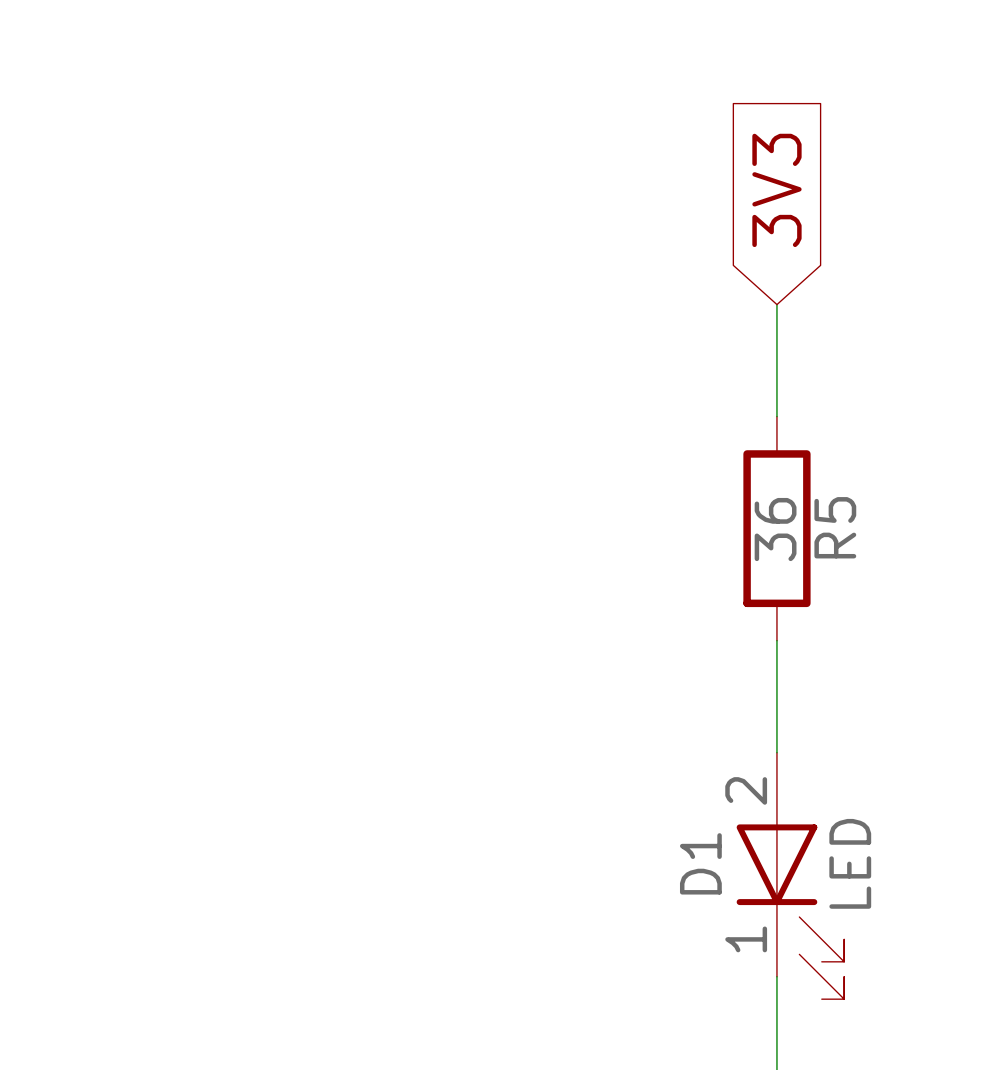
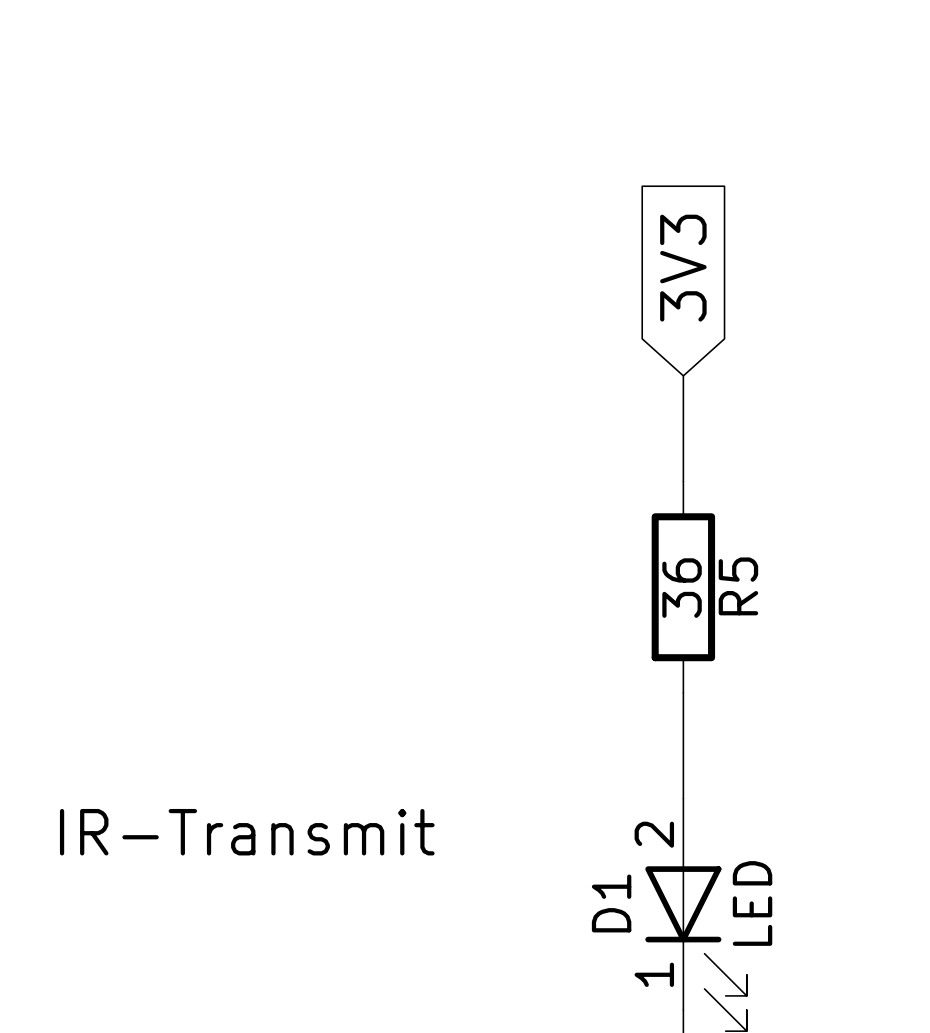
label: none -> IR-Transmit (247, 832)

